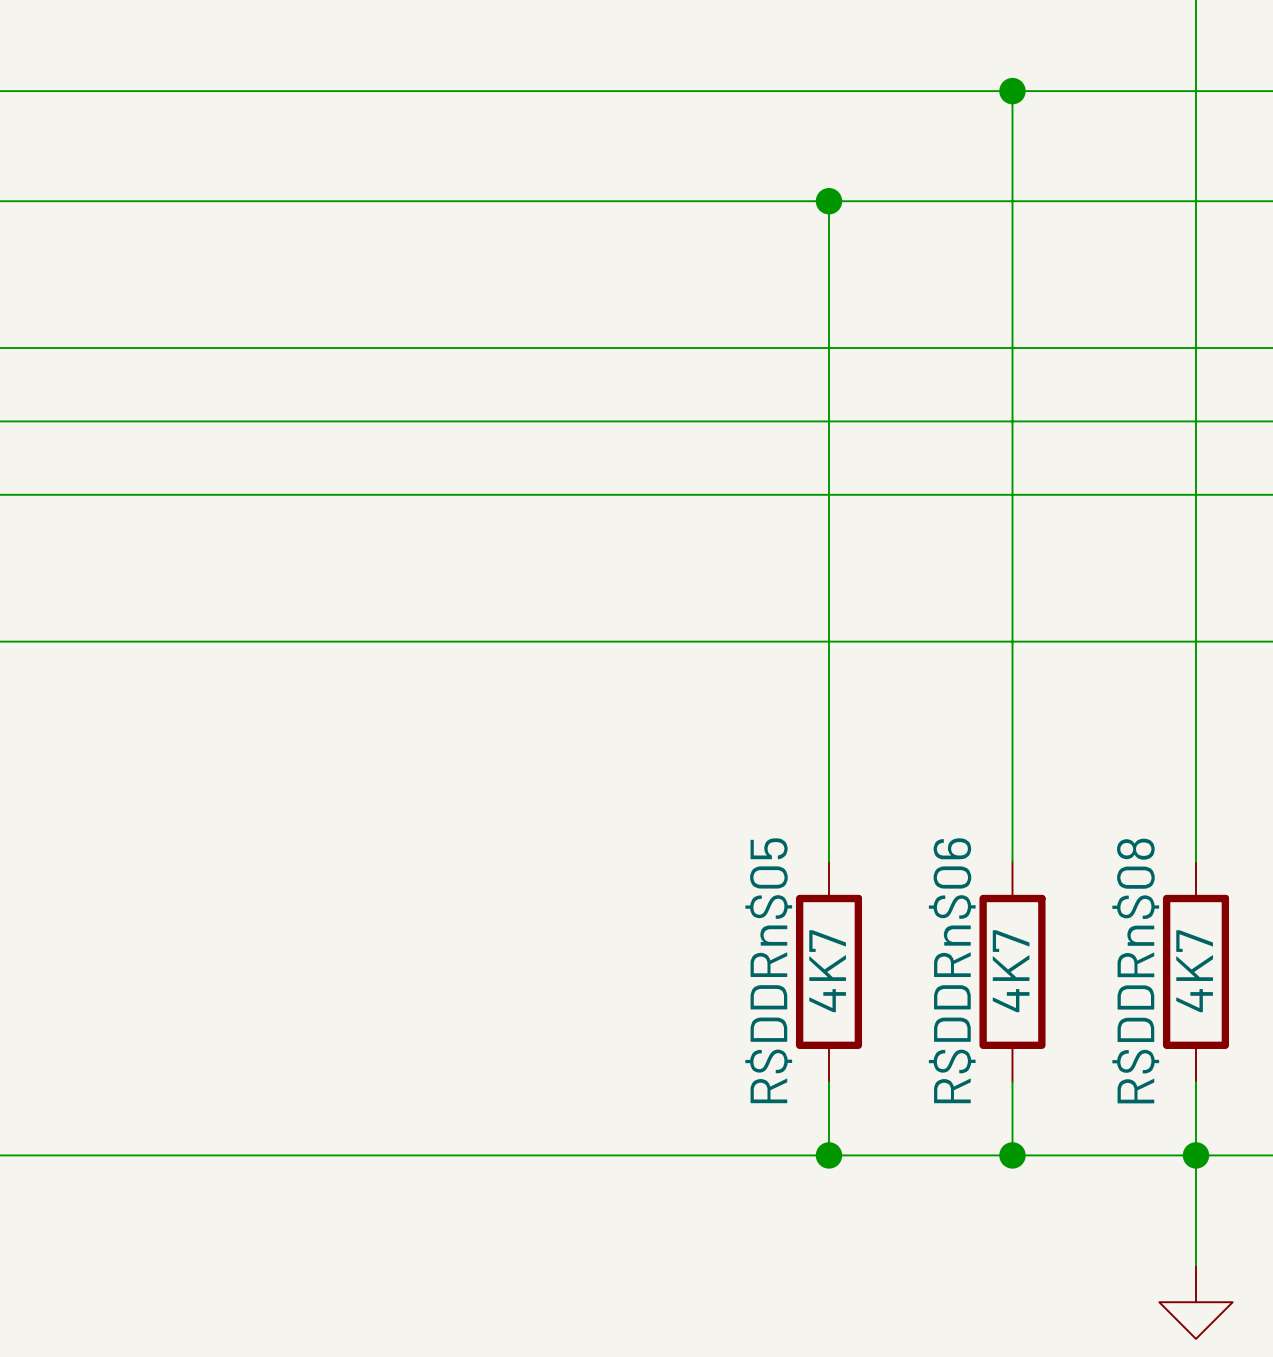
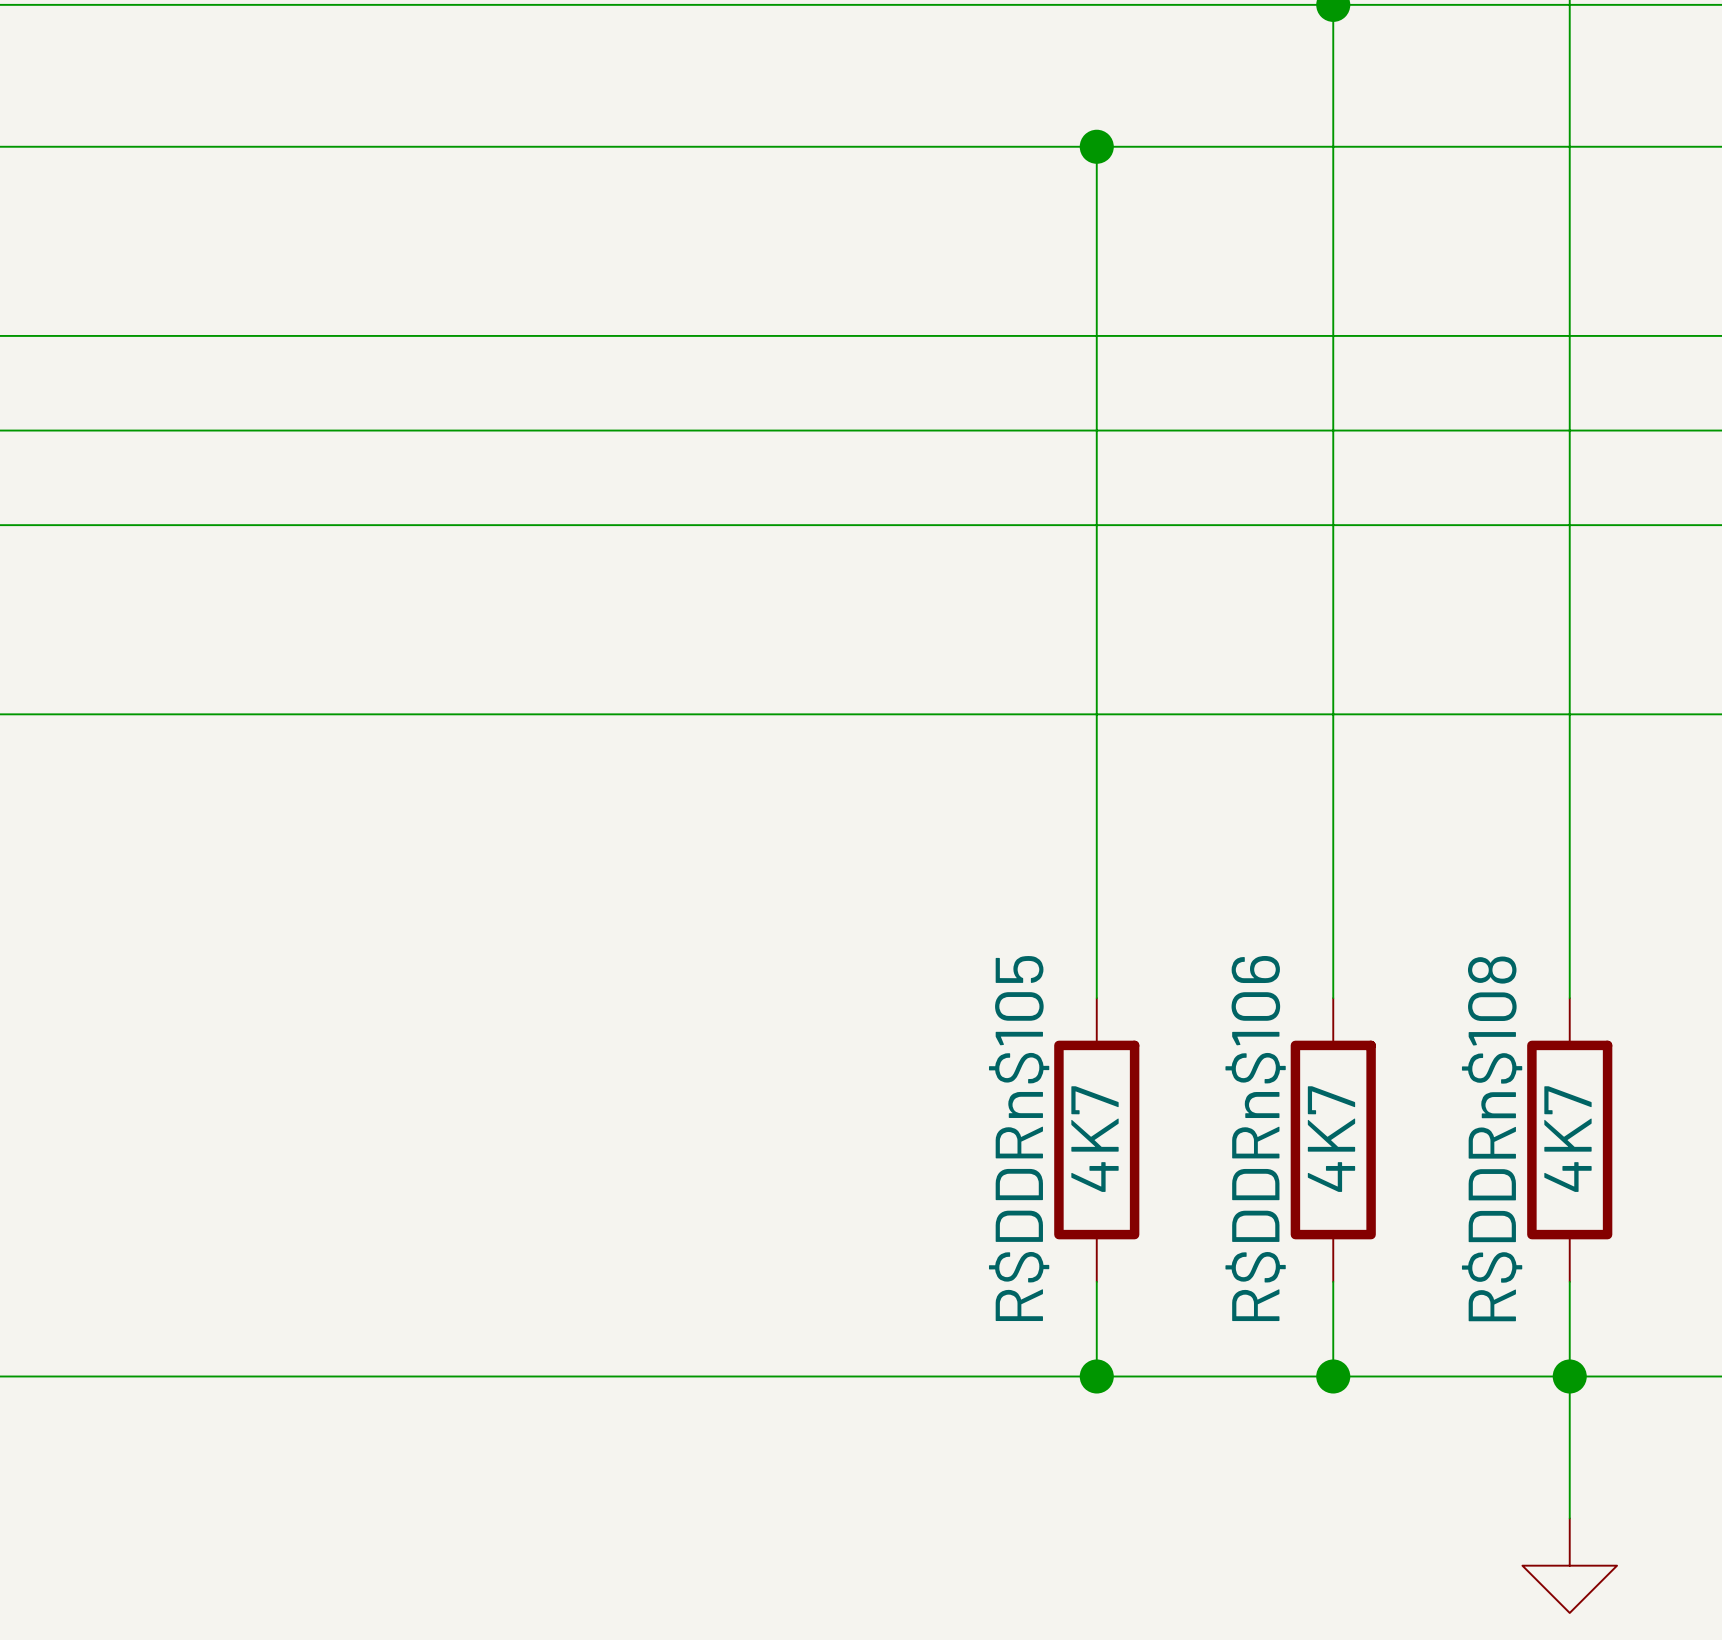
R$DDRn$05 name: R$DDRn$05 (768, 970) -> R$DDRn$105 (1019, 1138)
R$DDRn$06 name: R$DDRn$06 (952, 970) -> R$DDRn$106 (1255, 1138)
R$DDRn$08 name: R$DDRn$08 (1135, 971) -> R$DDRn$108 (1492, 1138)

